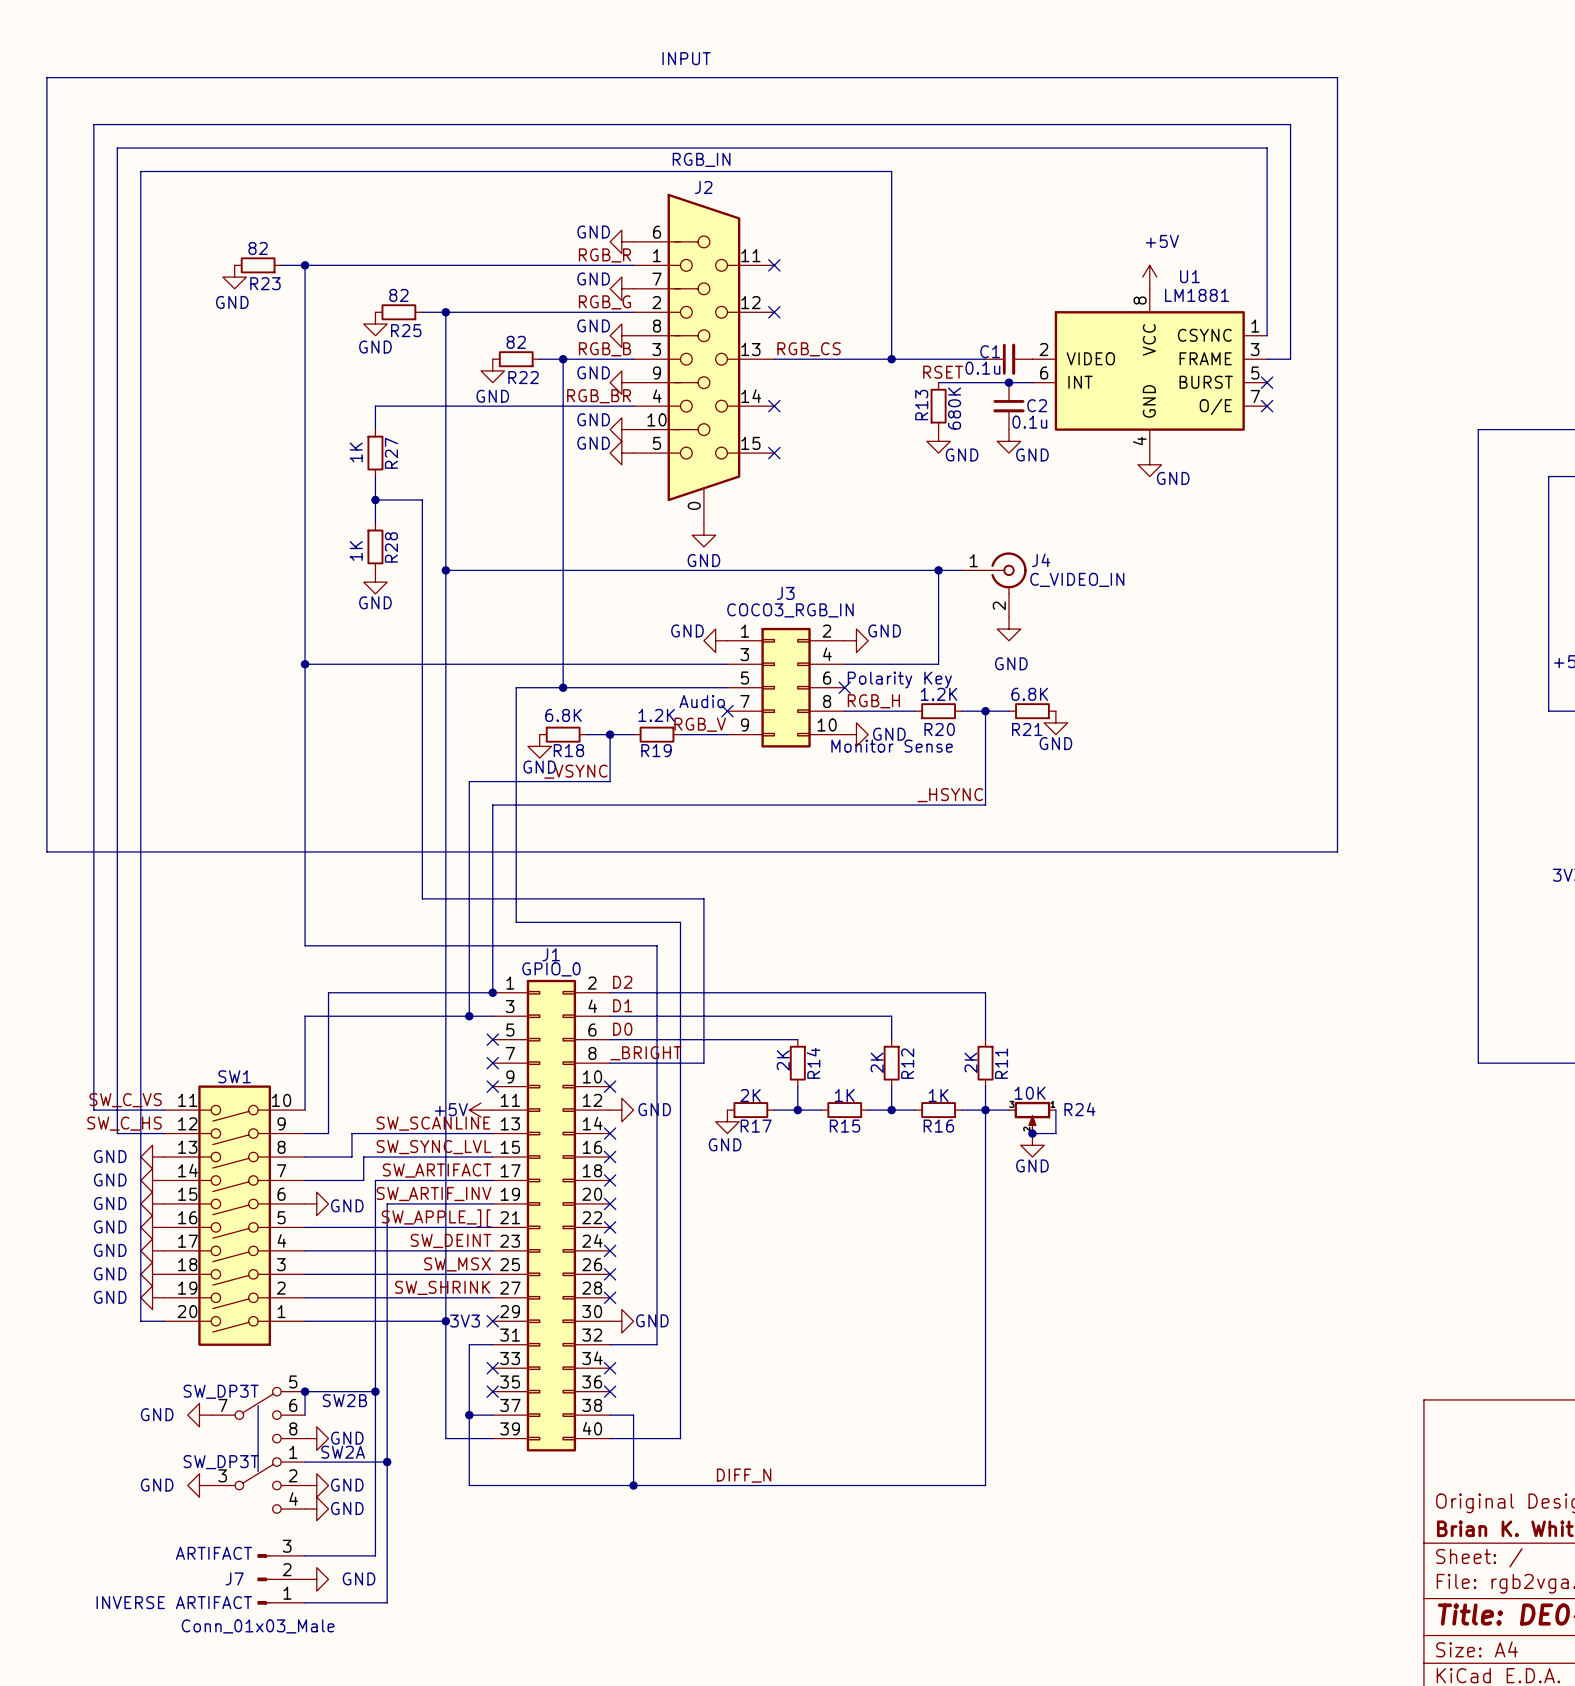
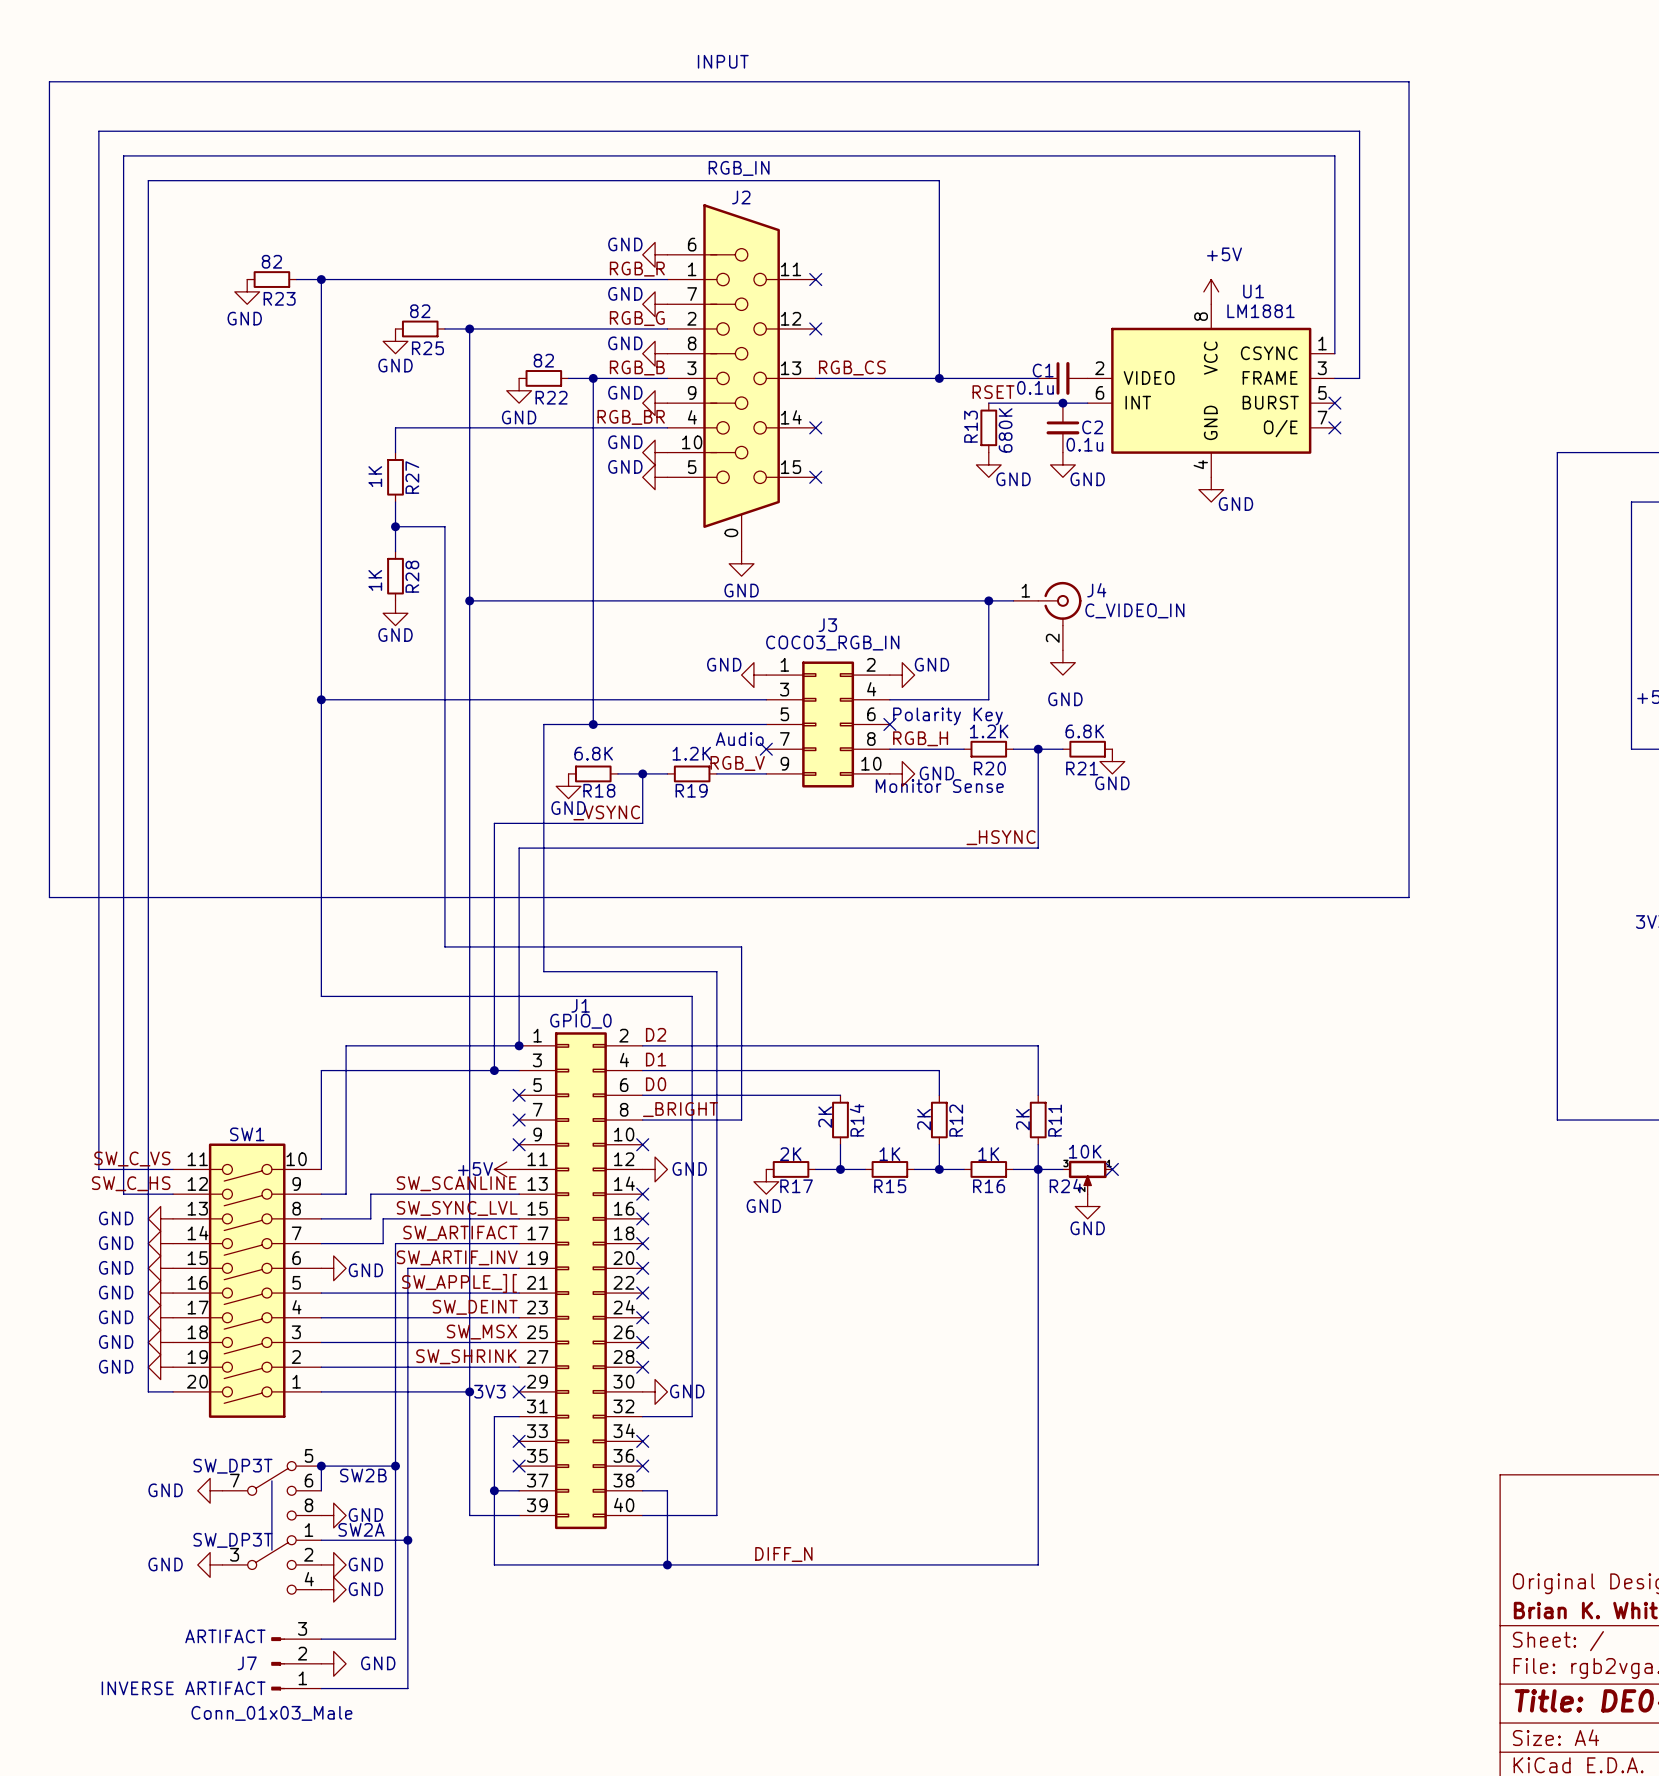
R24 name position: R24 (1079, 1109) -> R24 (1066, 1185)
wire: (1055, 1110) (1055, 1133) (1032, 1133) -> none
no-connect mark: none -> (1112, 1169)
junction: (1032, 1133) -> none

